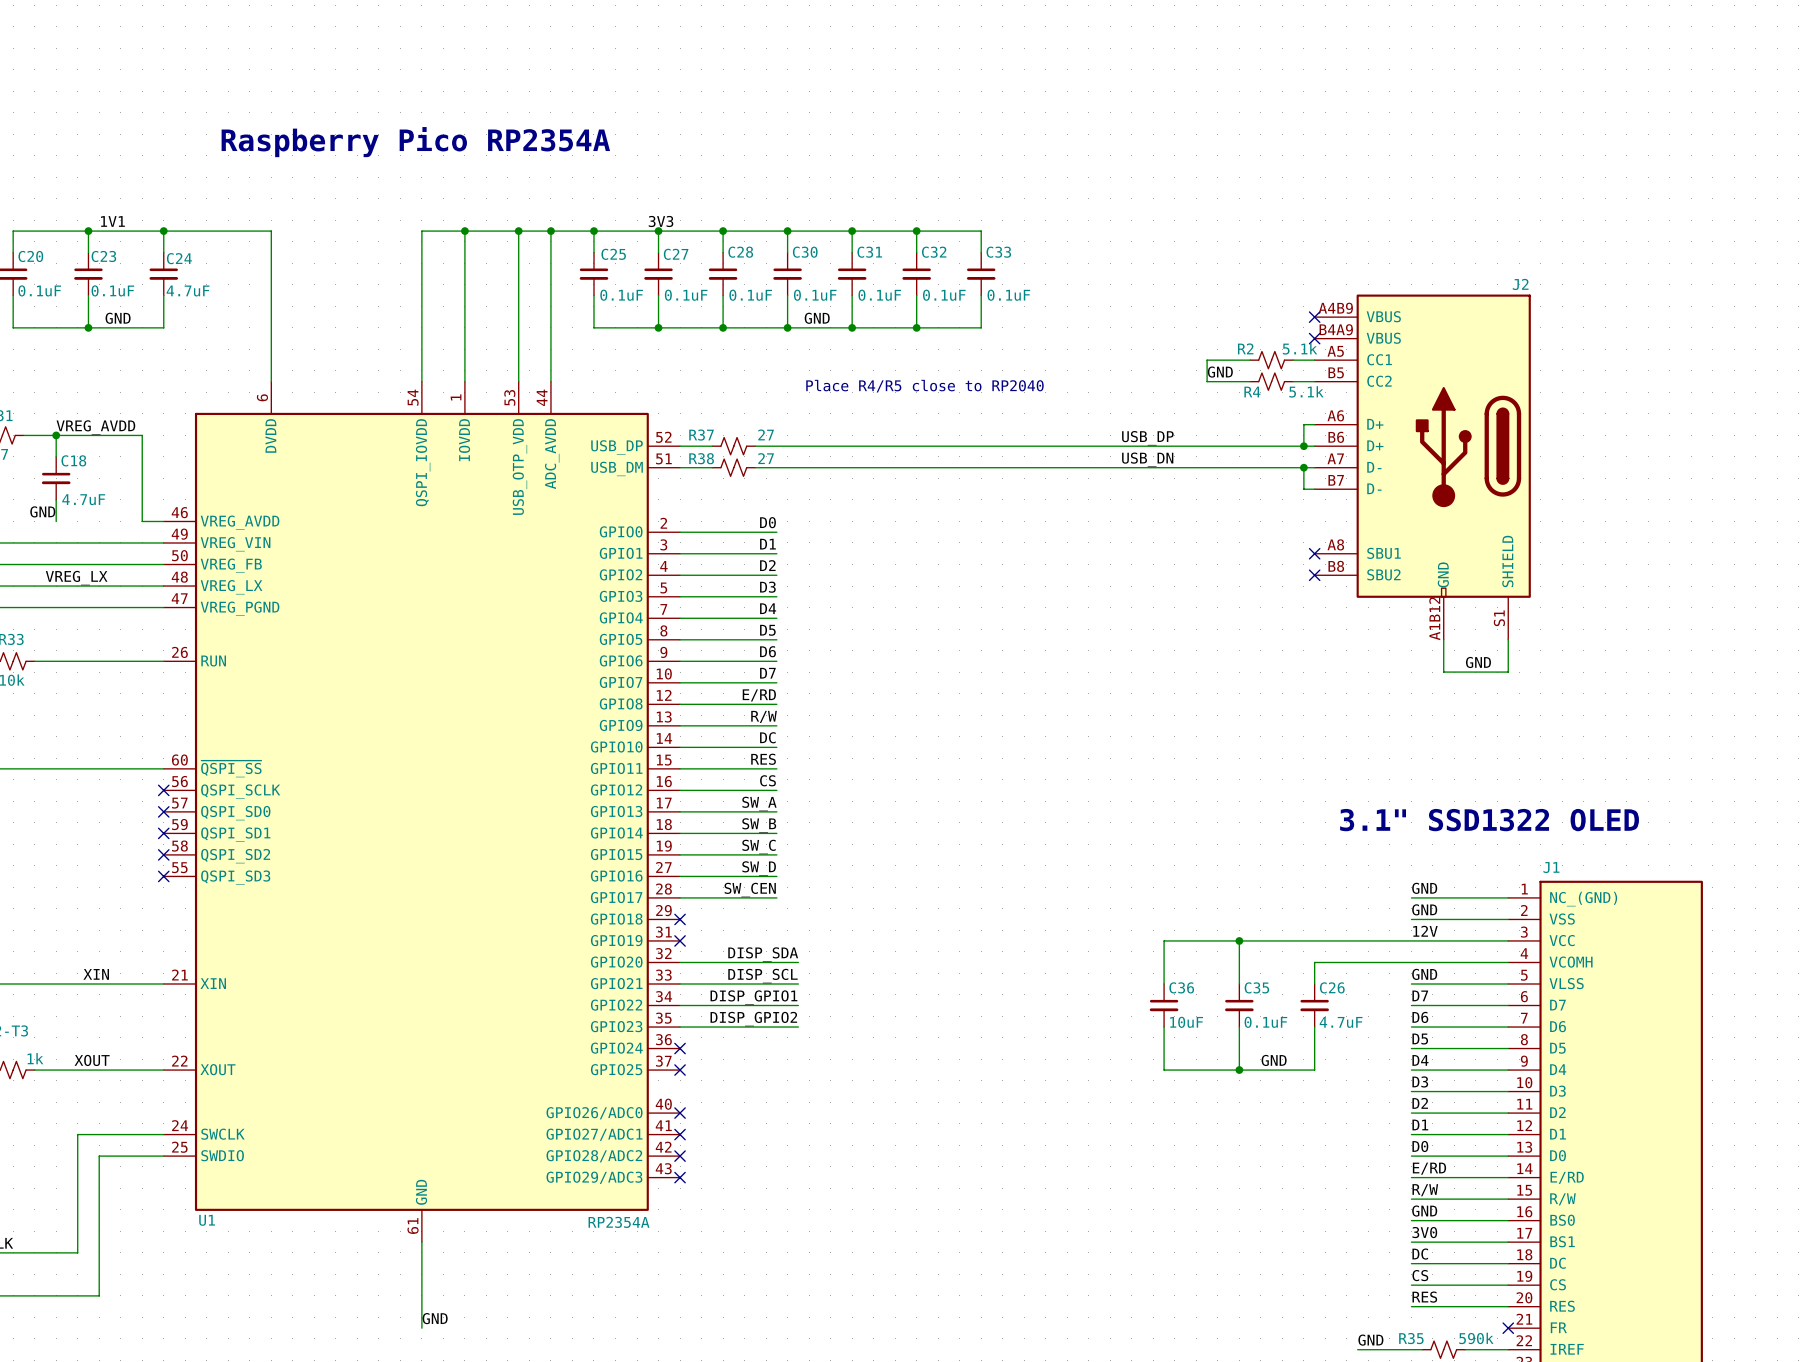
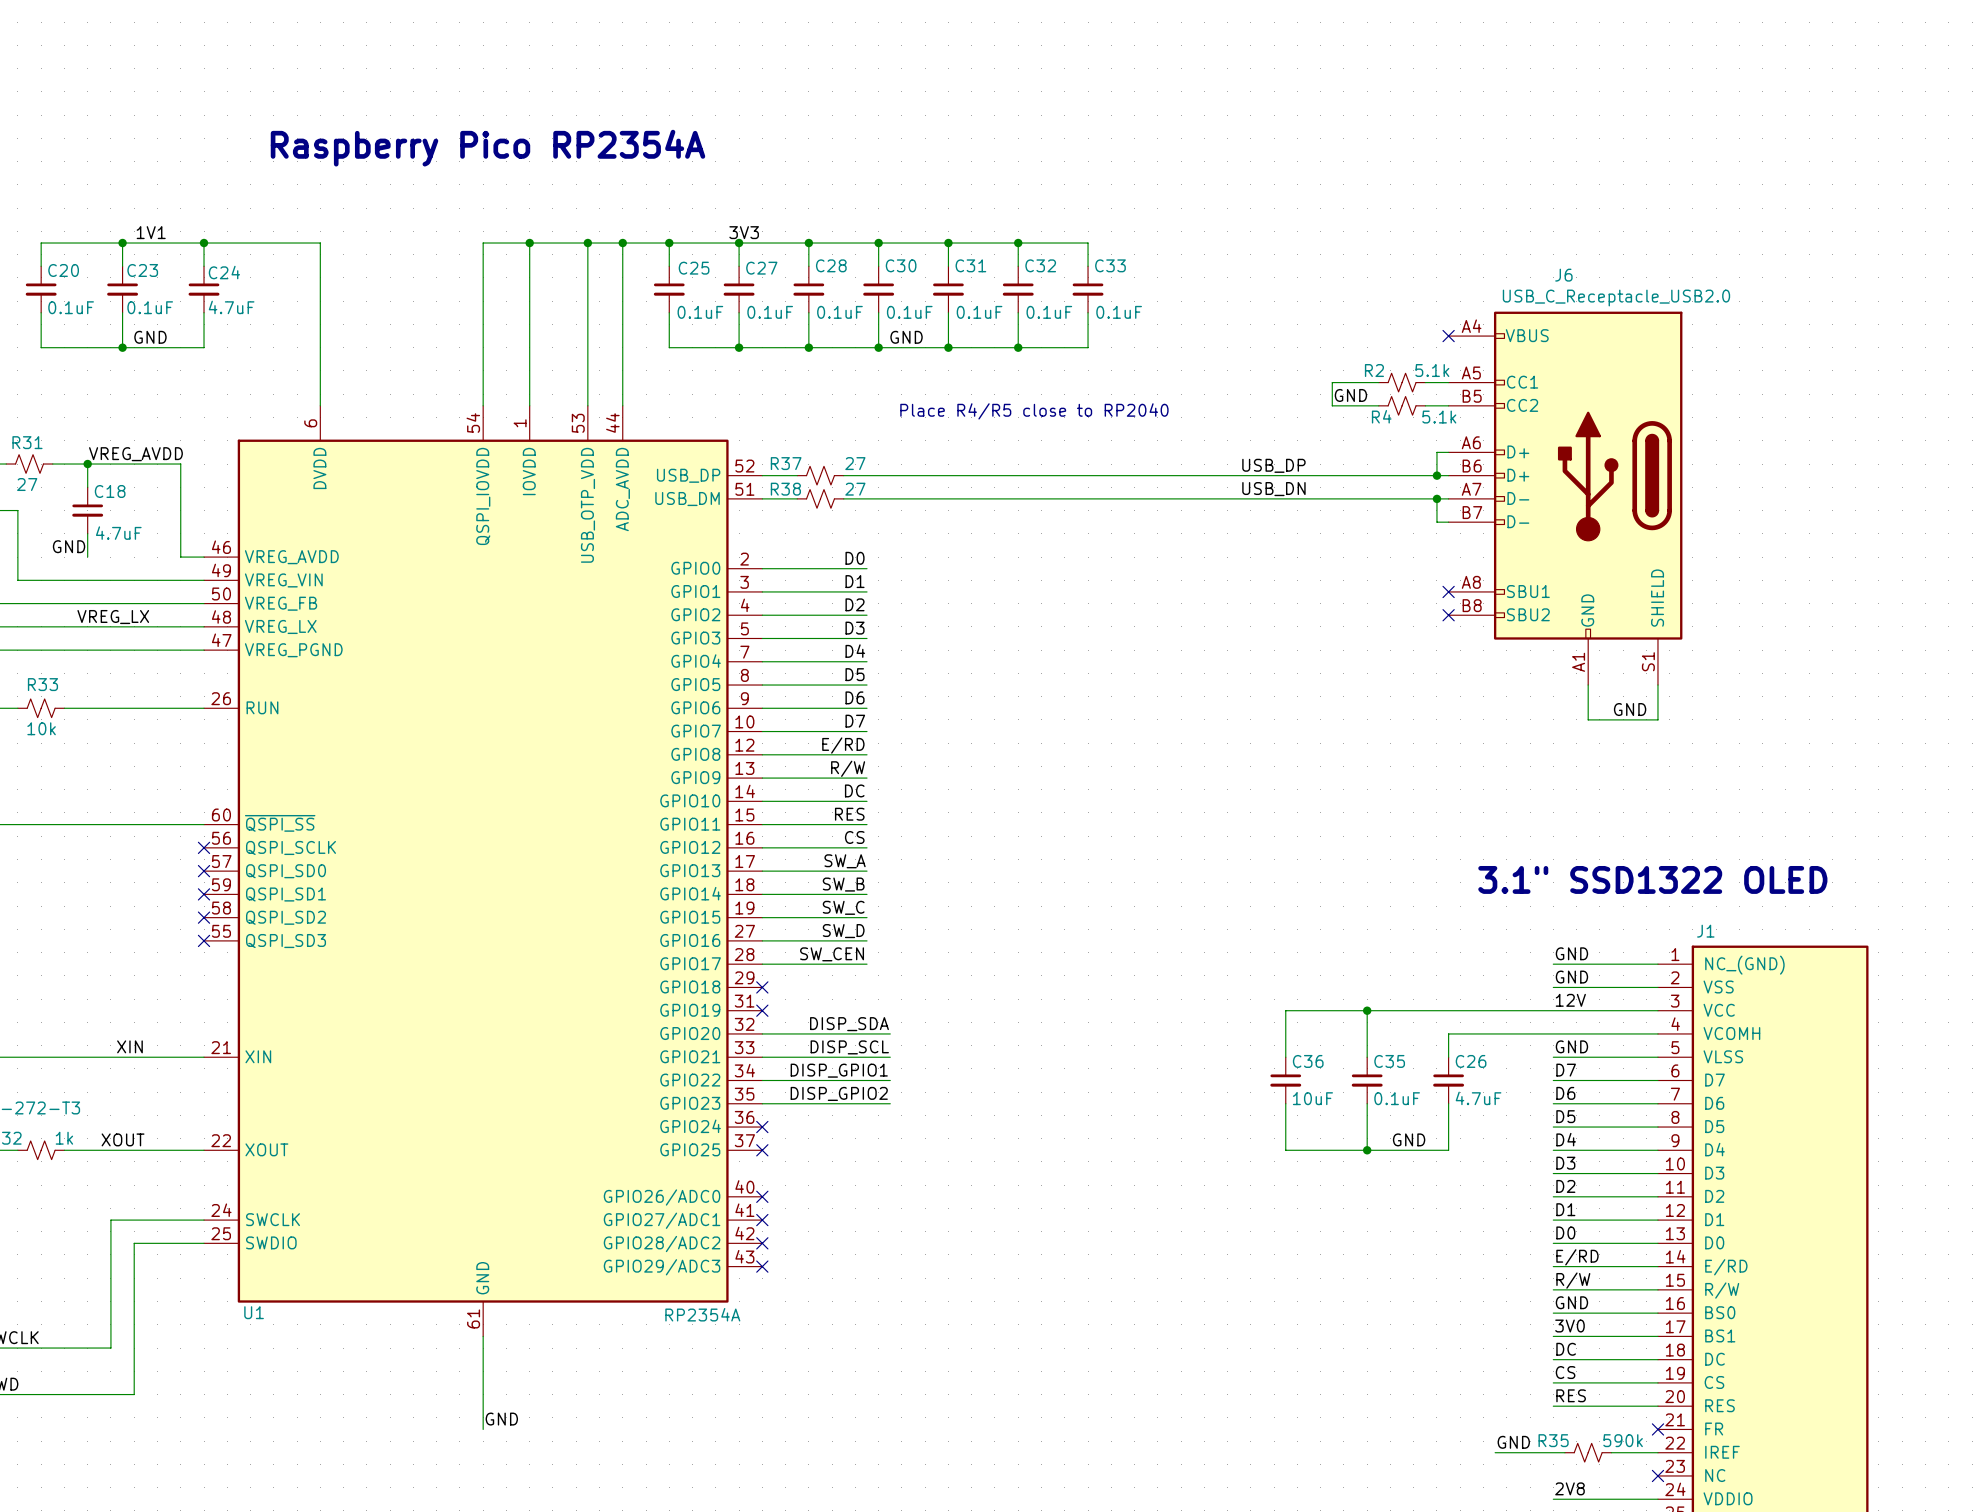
no-connect mark: (1314, 338) -> none
J2: (1422, 467) -> none
J6: none -> USB_C_Receptacle_USB2.0 (1565, 498)

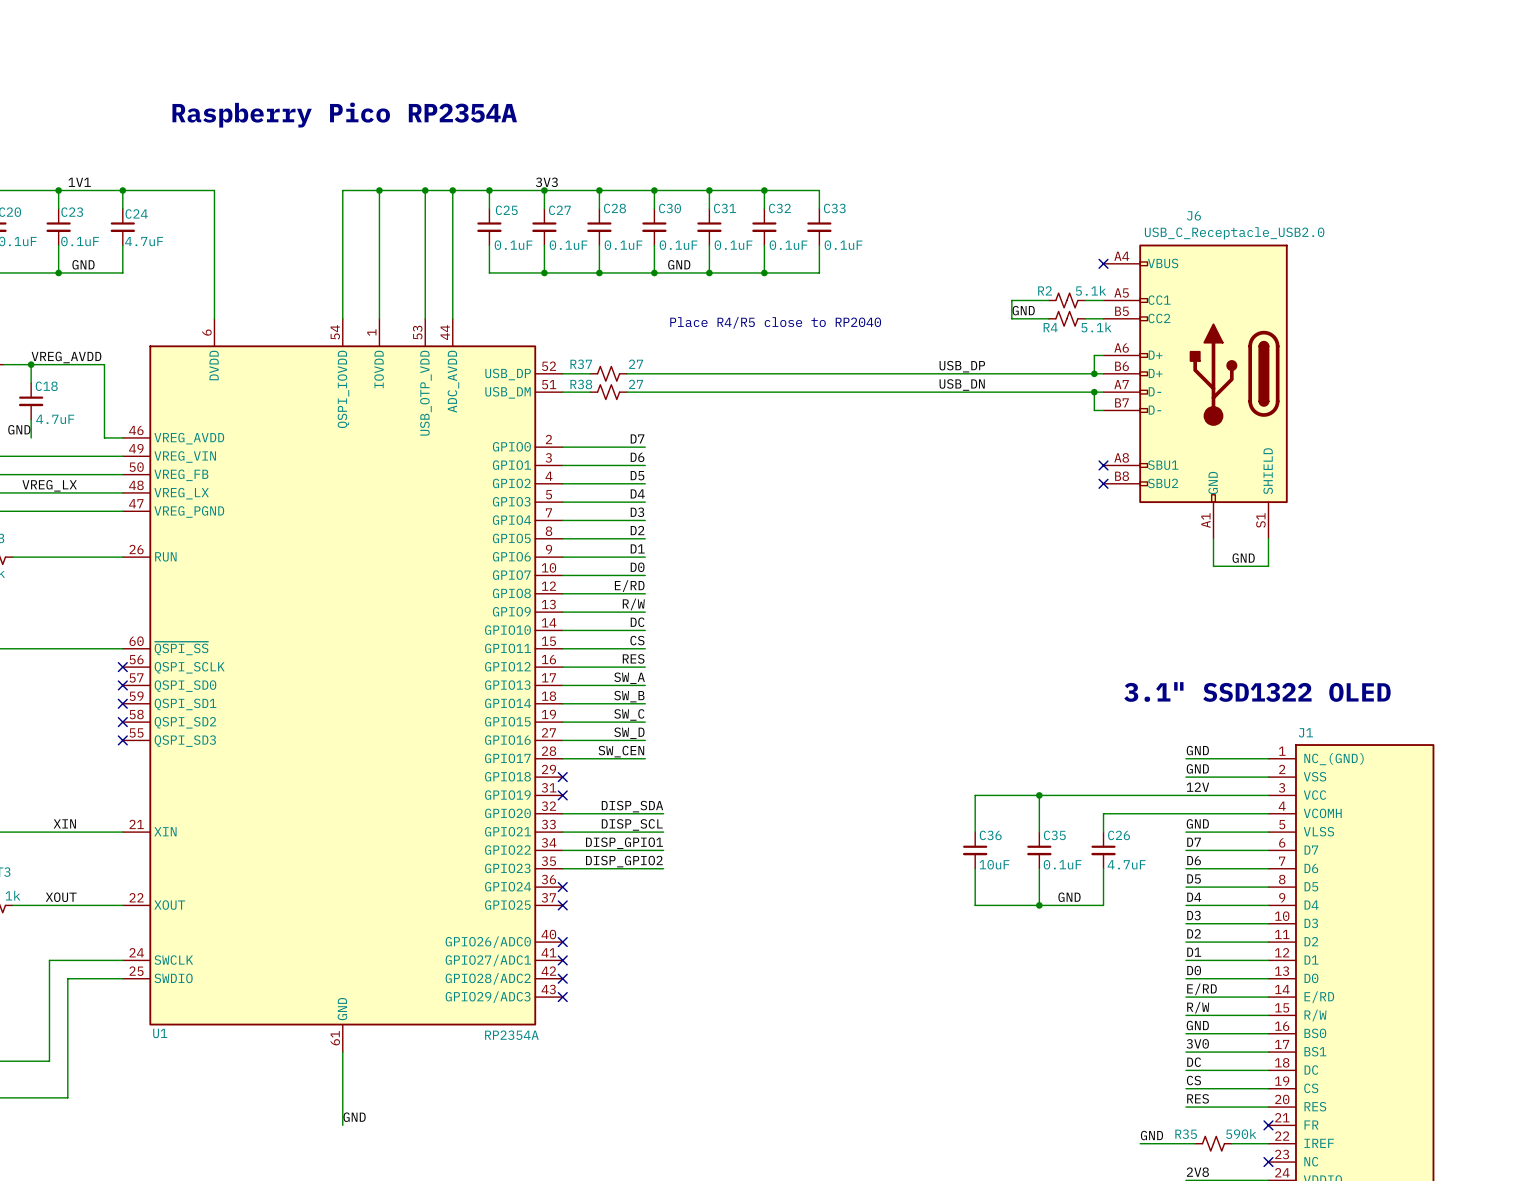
label: D0 (855, 558) -> D7 (637, 438)
label: D1 (855, 581) -> D6 (637, 457)
label: D2 (855, 604) -> D5 (637, 475)
label: D3 (855, 628) -> D4 (637, 493)
label: D4 (855, 651) -> D3 (637, 512)
label: D5 (855, 674) -> D2 (637, 530)
label: D6 (855, 697) -> D1 (637, 548)
label: D7 (855, 721) -> D0 (637, 567)
label: RES (849, 814) -> CS (637, 640)
label: CS (854, 837) -> RES (633, 658)

